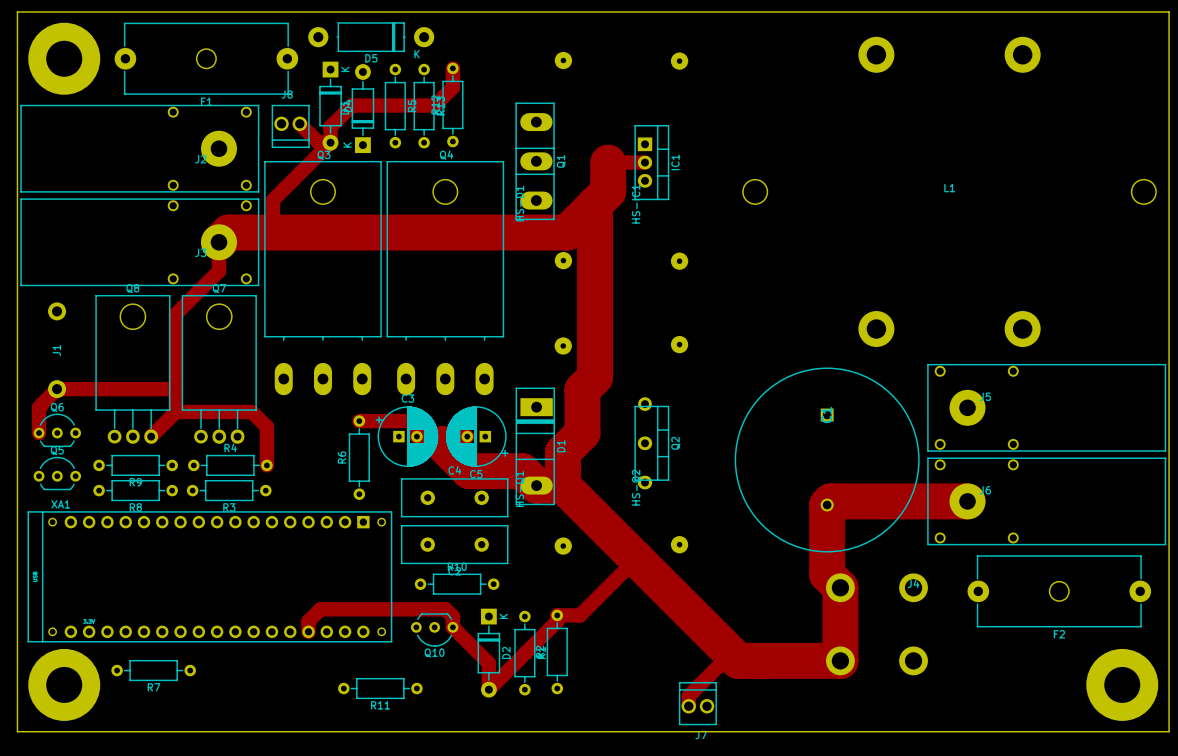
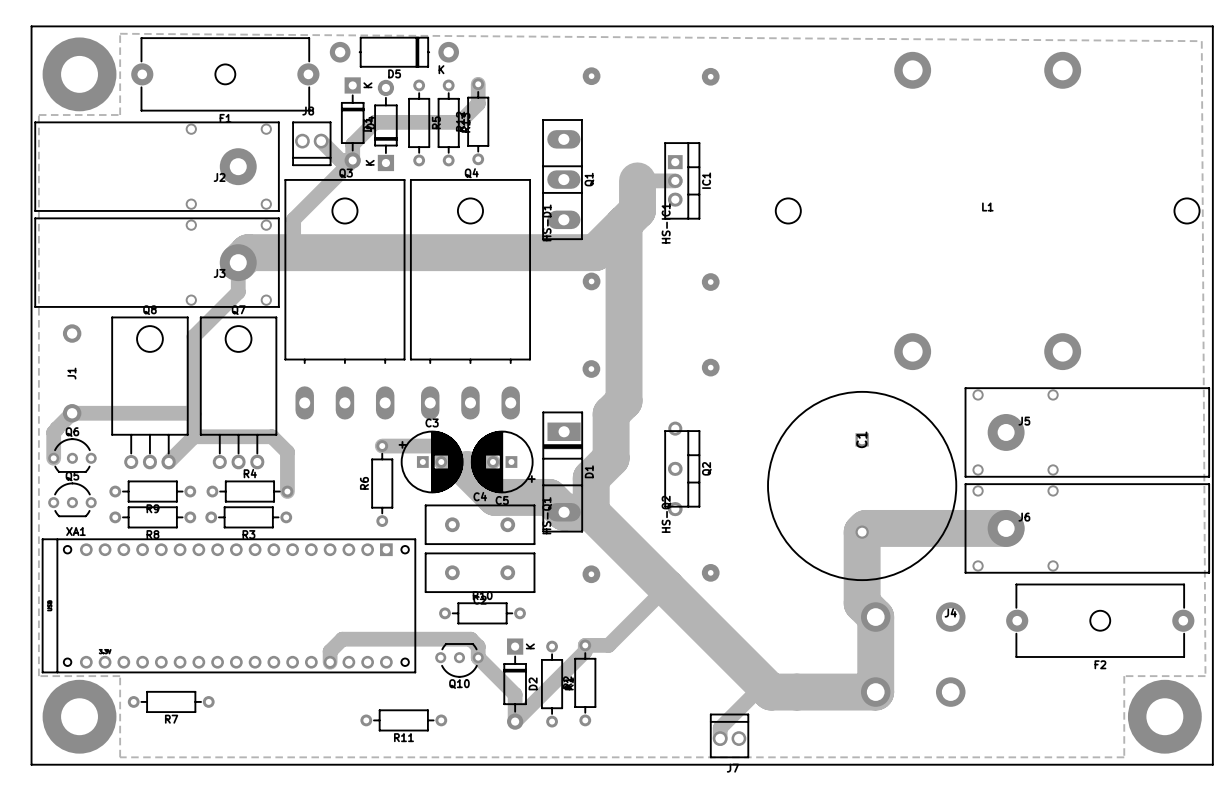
zone outline: none -> (120, 33) (120, 114) (38, 114) (38, 676) (120, 676) (120, 757) (1124, 757) (1124, 676) (1205, 676) (1201, 41) (120, 33)

